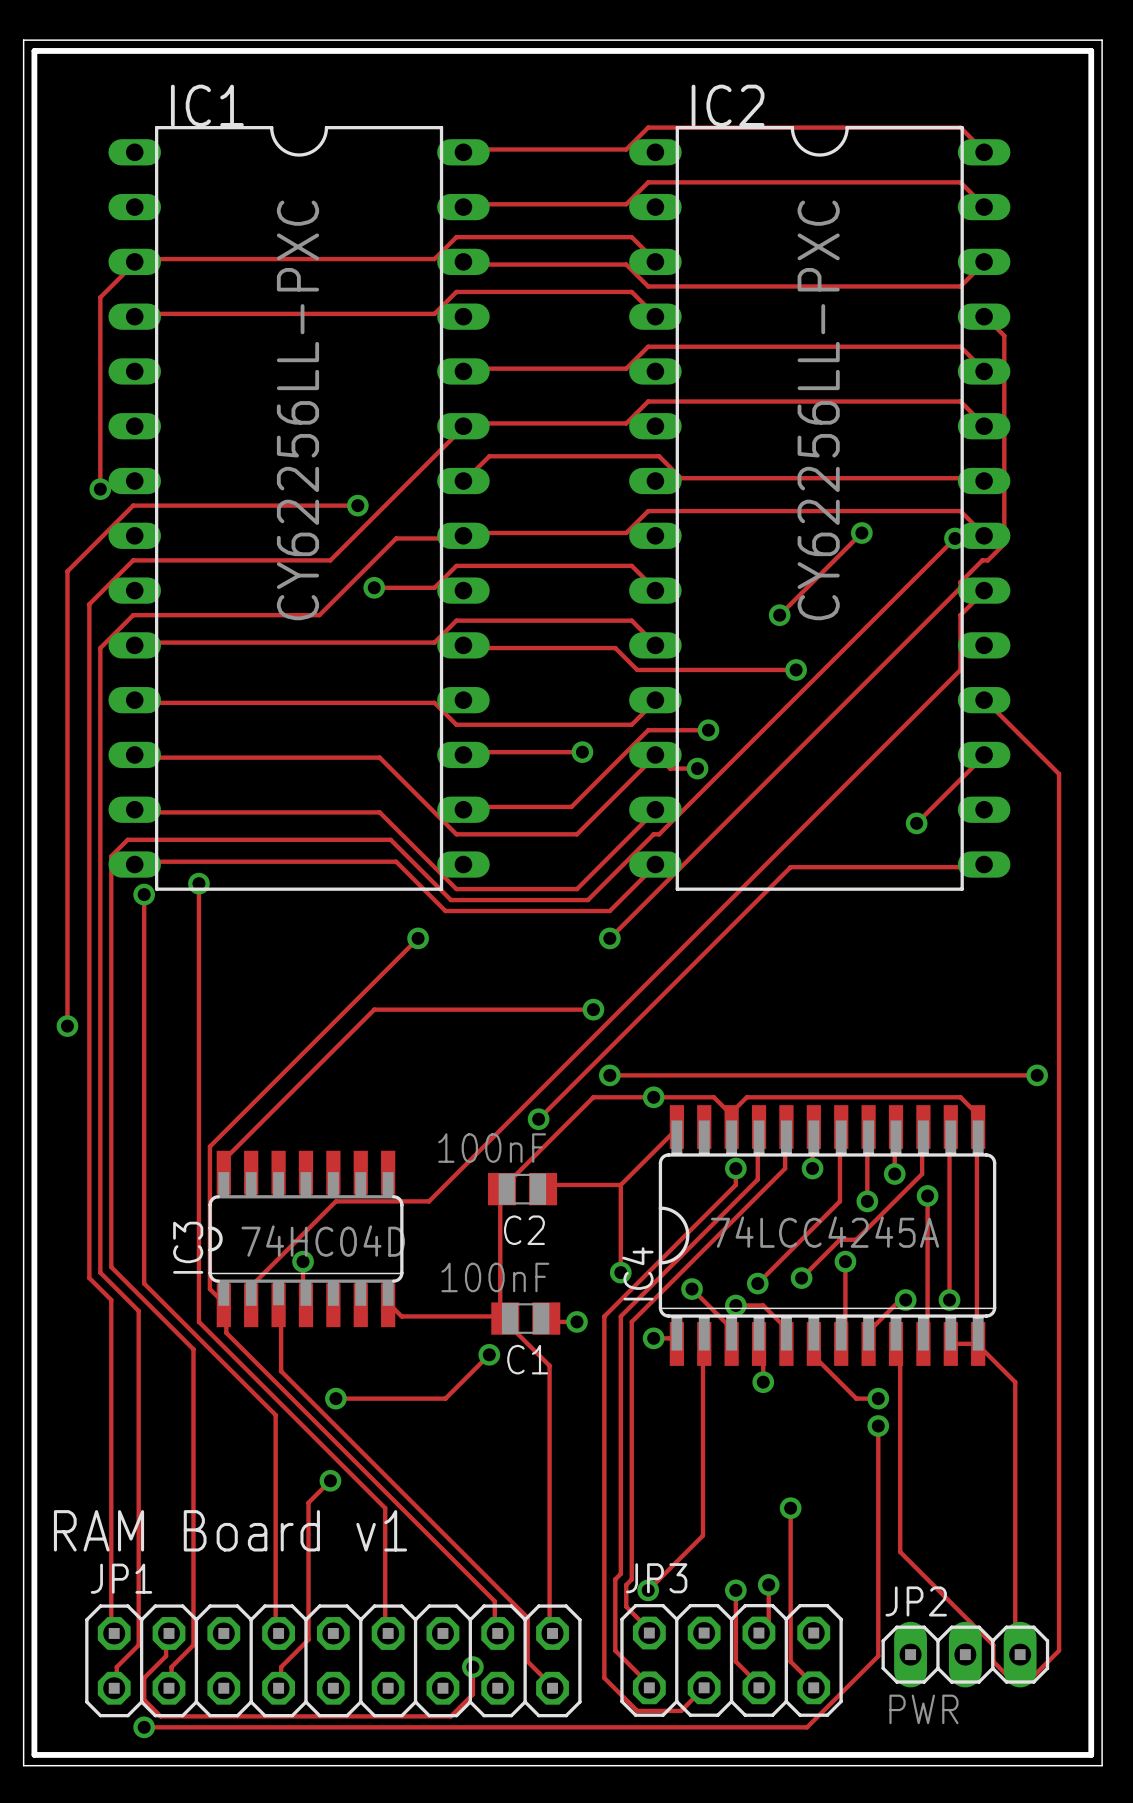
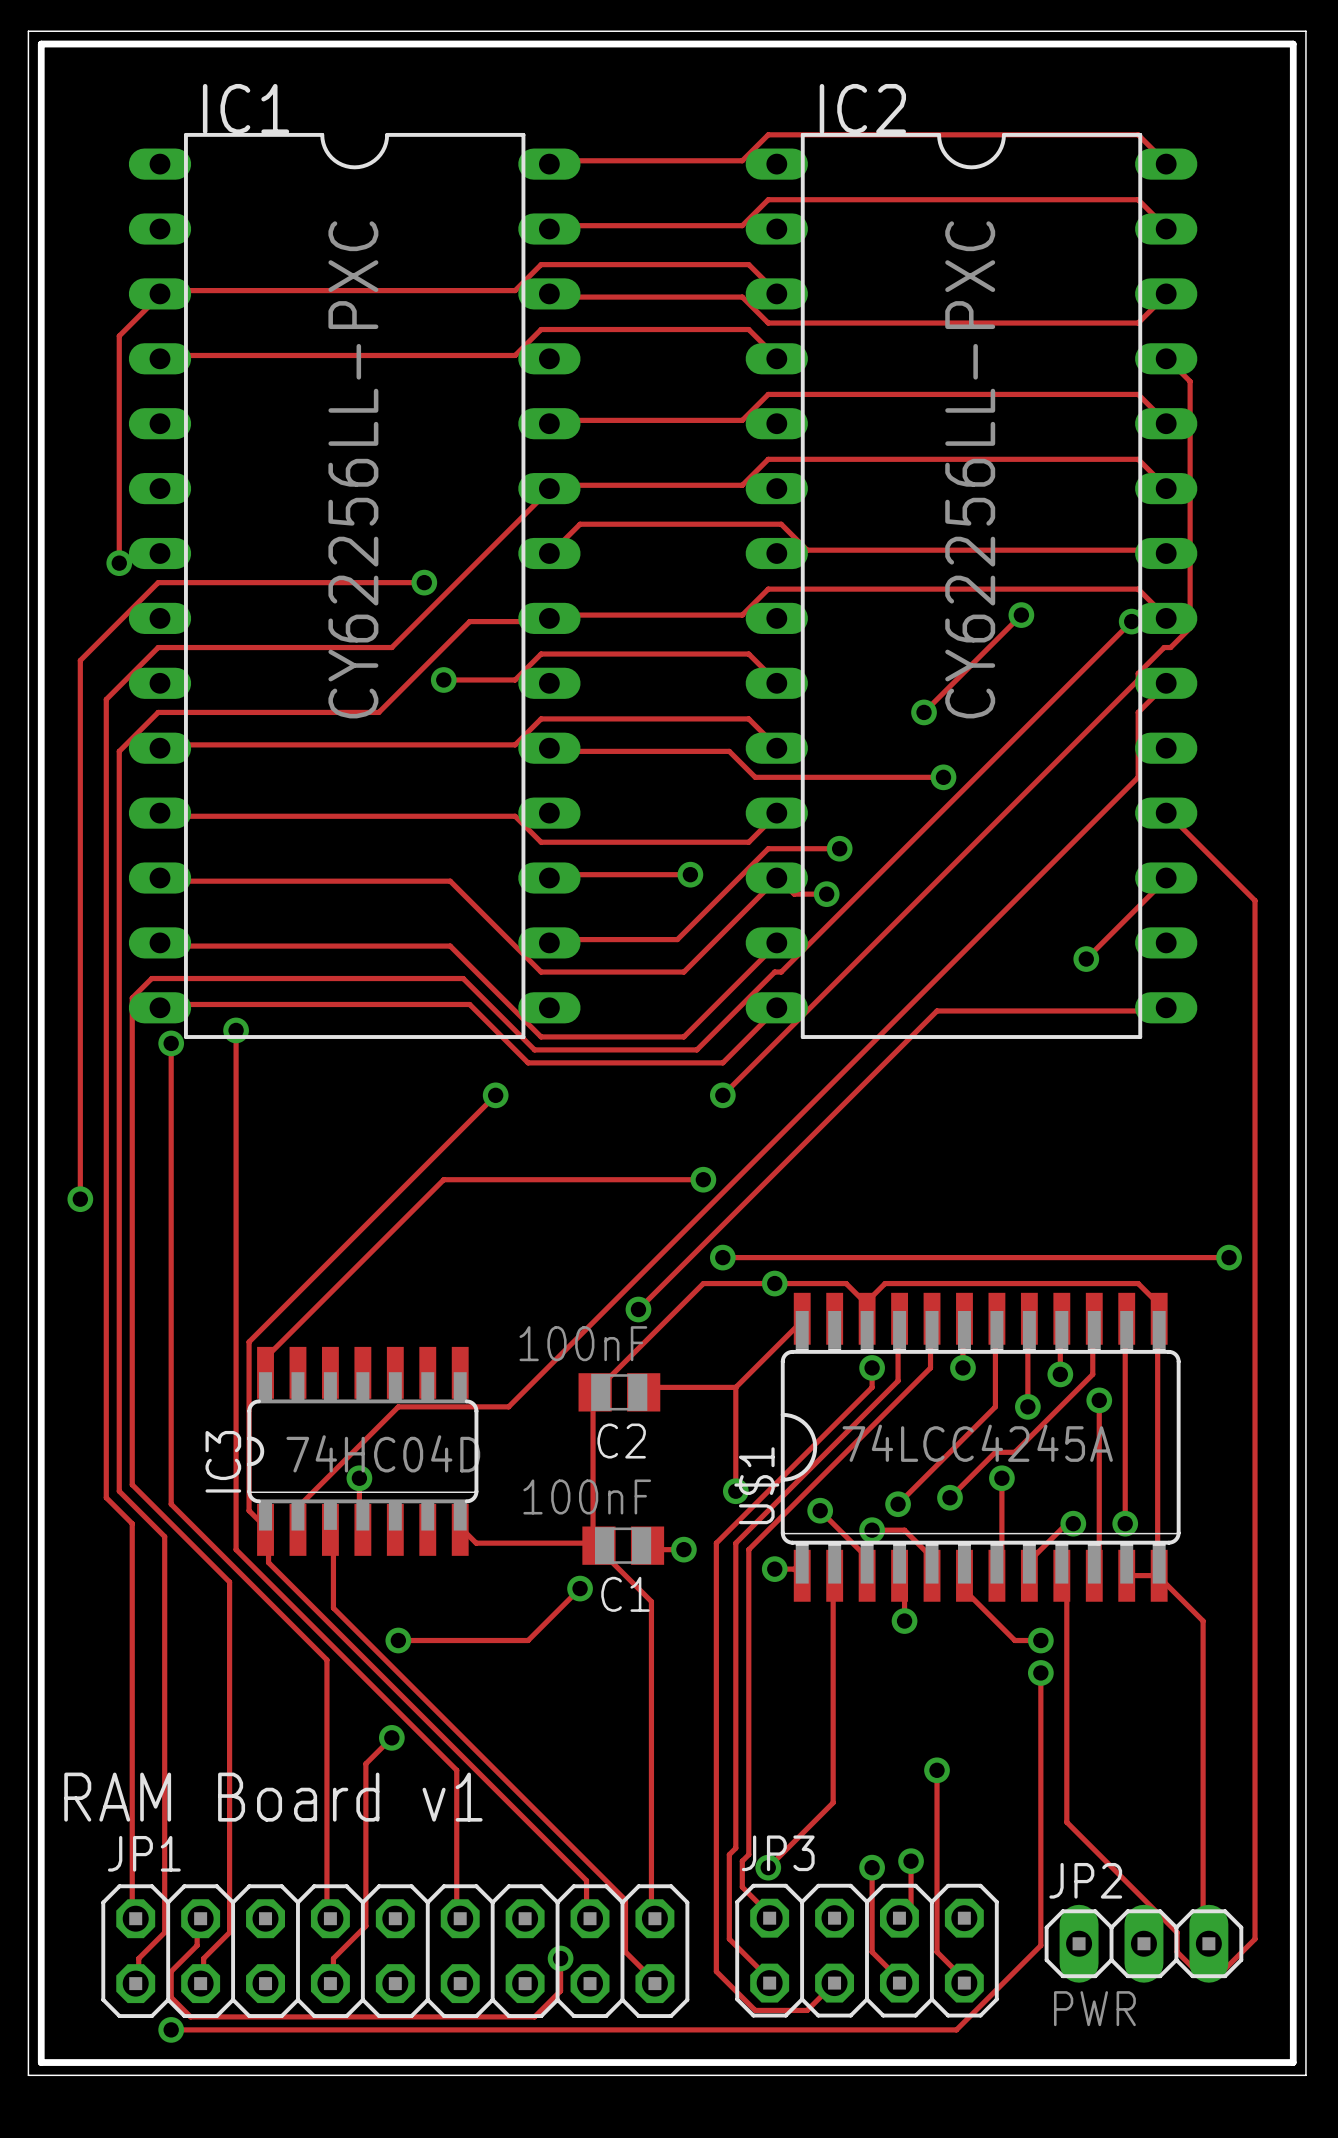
IC4 name: IC4 (637, 1273) -> U$1 (756, 1485)

